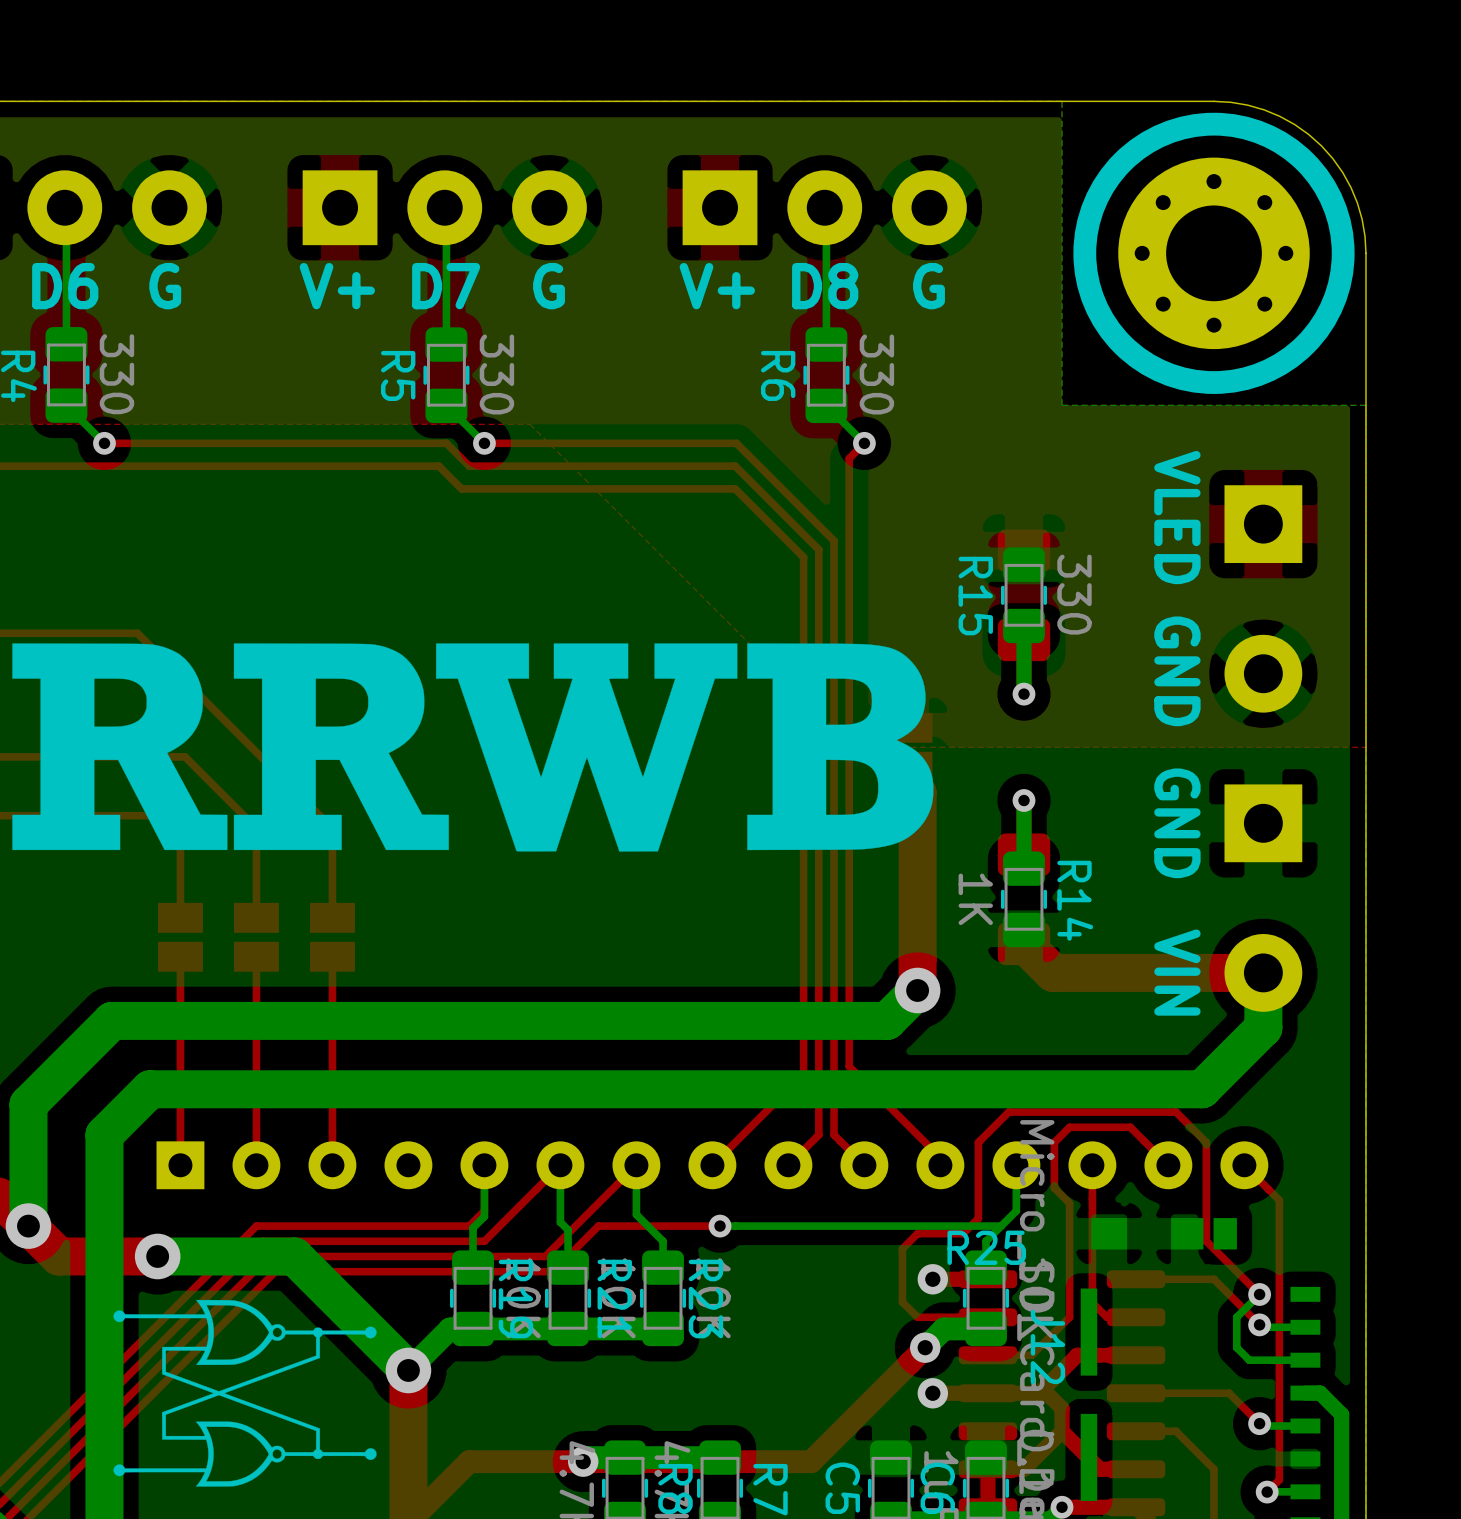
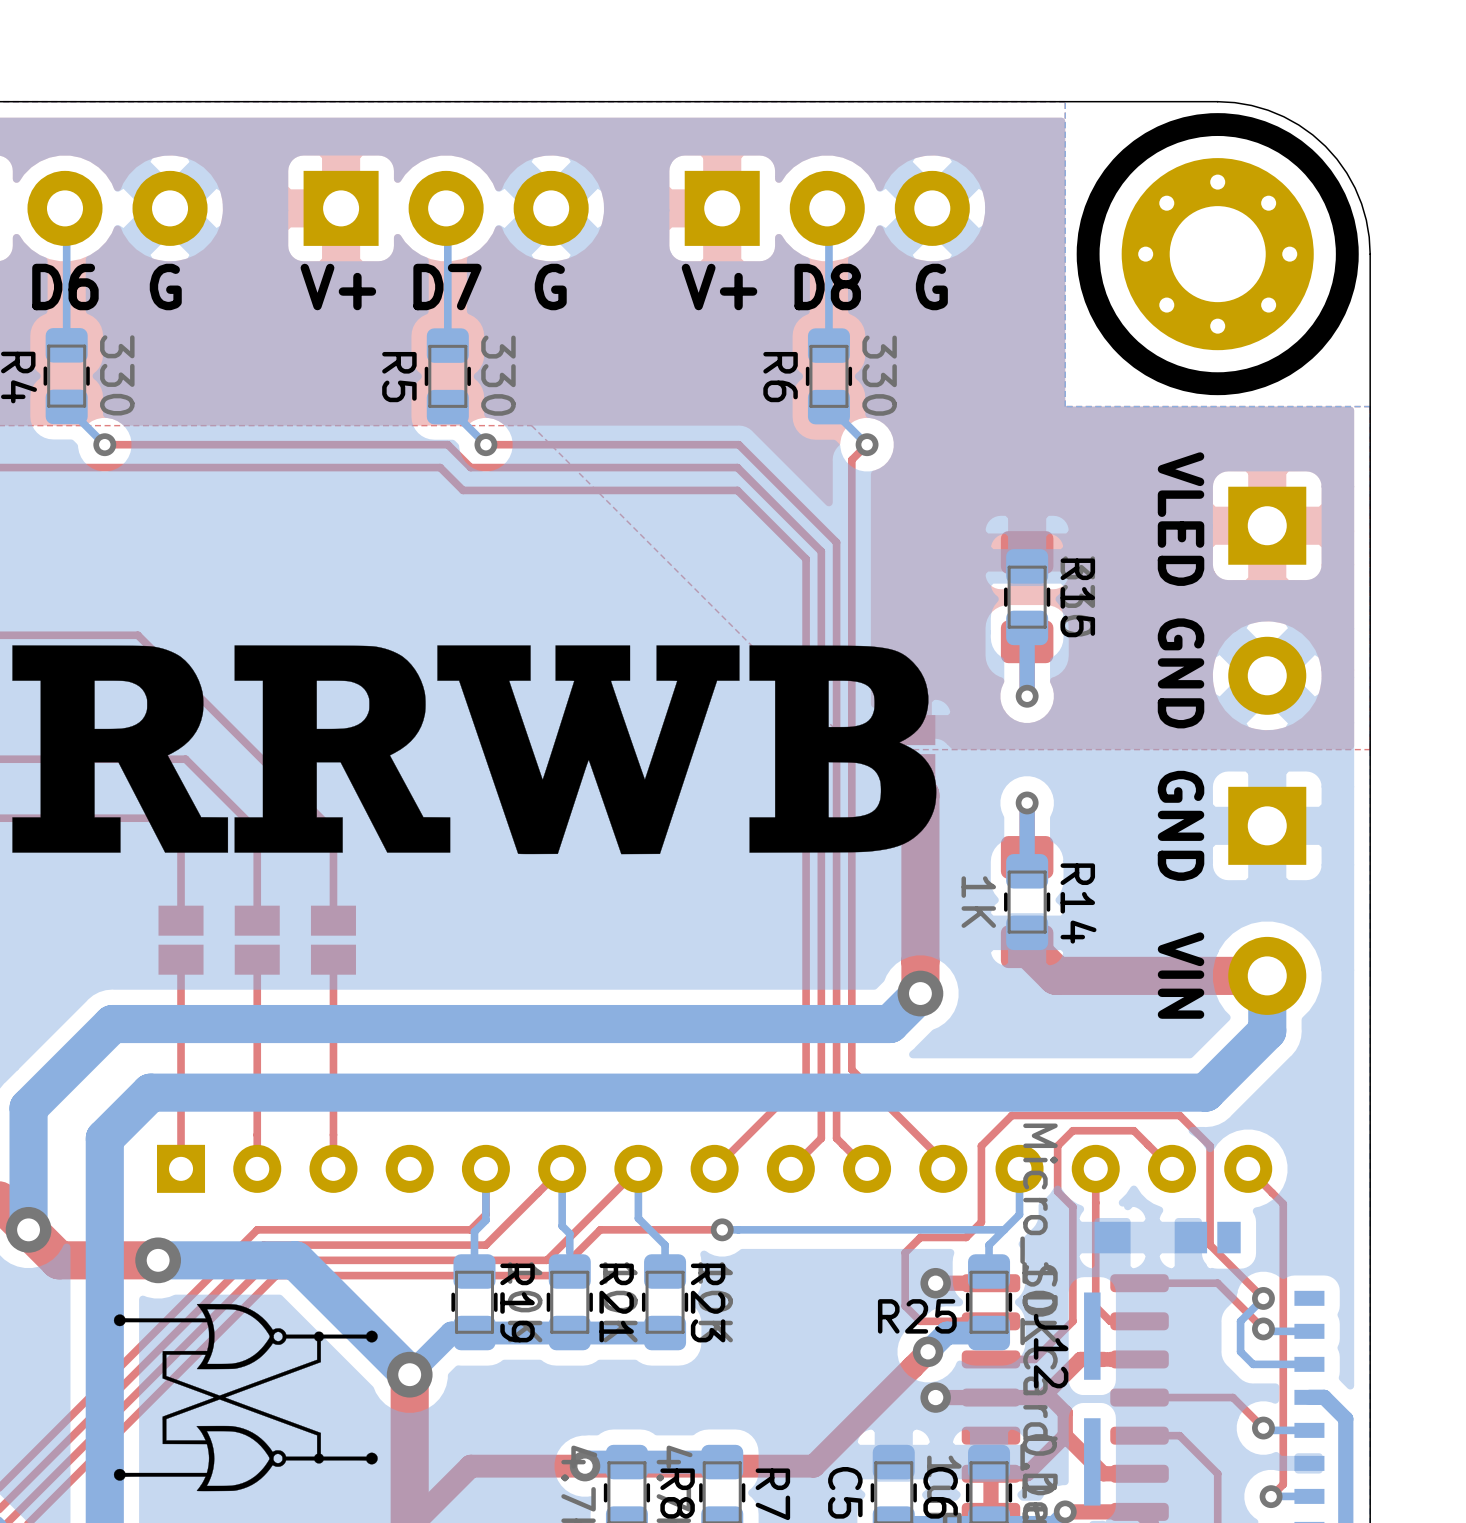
R15 name position: R15 (975, 596) -> R15 (1077, 597)
R25 name position: R25 (986, 1247) -> R25 (917, 1316)

